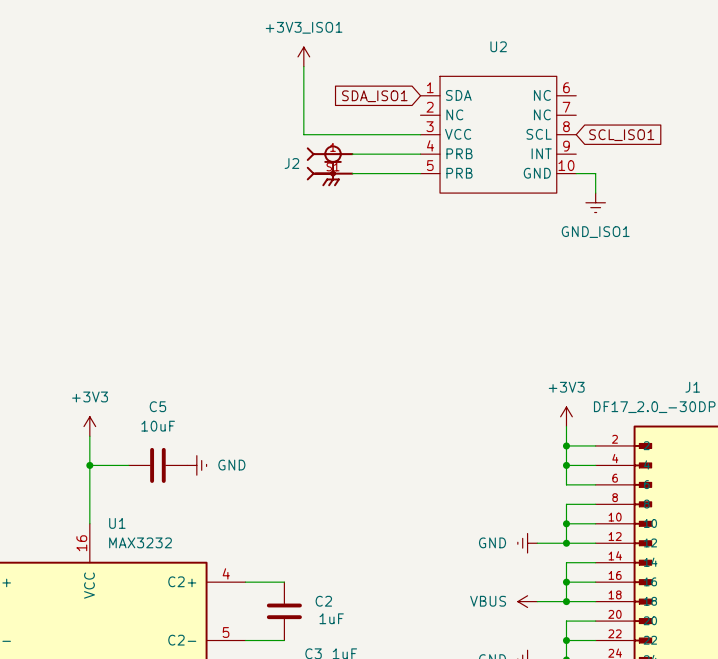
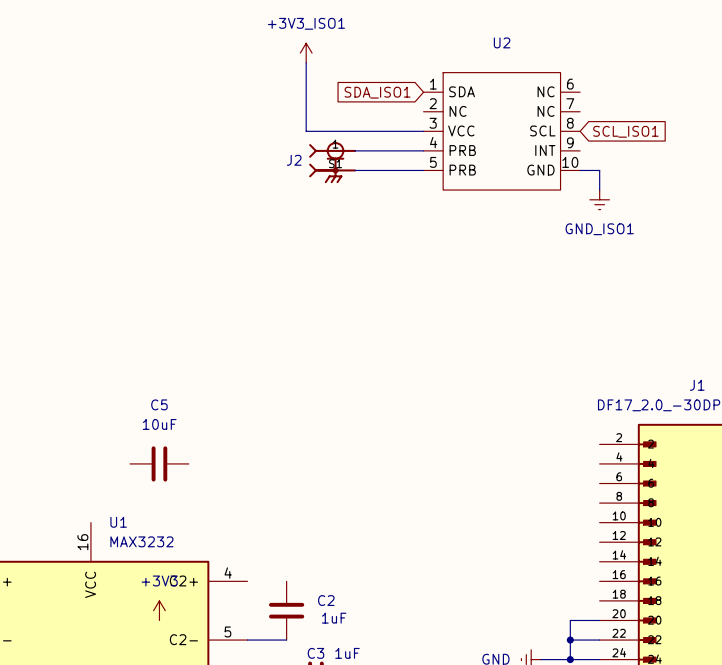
power symbol: +3V3 (566, 416) -> none
power symbol: +3V3 (89, 426) -> none
wire: (566, 426) (566, 484) (595, 484) -> none
wire: (89, 436) (89, 523) -> none
wire: (566, 445) (595, 445) -> none
junction: (566, 445) -> none
wire: (89, 465) (128, 465) -> none
junction: (89, 465) -> none
power symbol: GND (196, 465) -> none
wire: (566, 465) (595, 465) -> none
junction: (566, 465) -> none
wire: (595, 504) (566, 504) (566, 543) -> none
wire: (566, 523) (595, 523) -> none
junction: (566, 523) -> none
power symbol: GND (527, 543) -> none
wire: (537, 543) (595, 543) -> none
junction: (566, 543) -> none
wire: (595, 562) (566, 562) (566, 601) -> none
wire: (245, 582) (284, 582) -> none
wire: (566, 582) (595, 582) -> none
junction: (566, 582) -> none
power symbol: VBUS (527, 601) -> none
wire: (537, 601) (595, 601) -> none
junction: (566, 601) -> none
power symbol: none -> +3V3 (159, 610)

